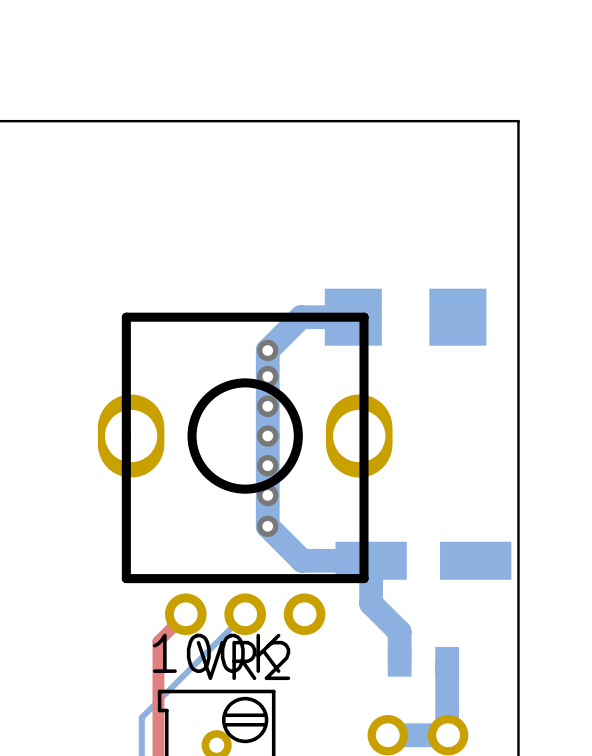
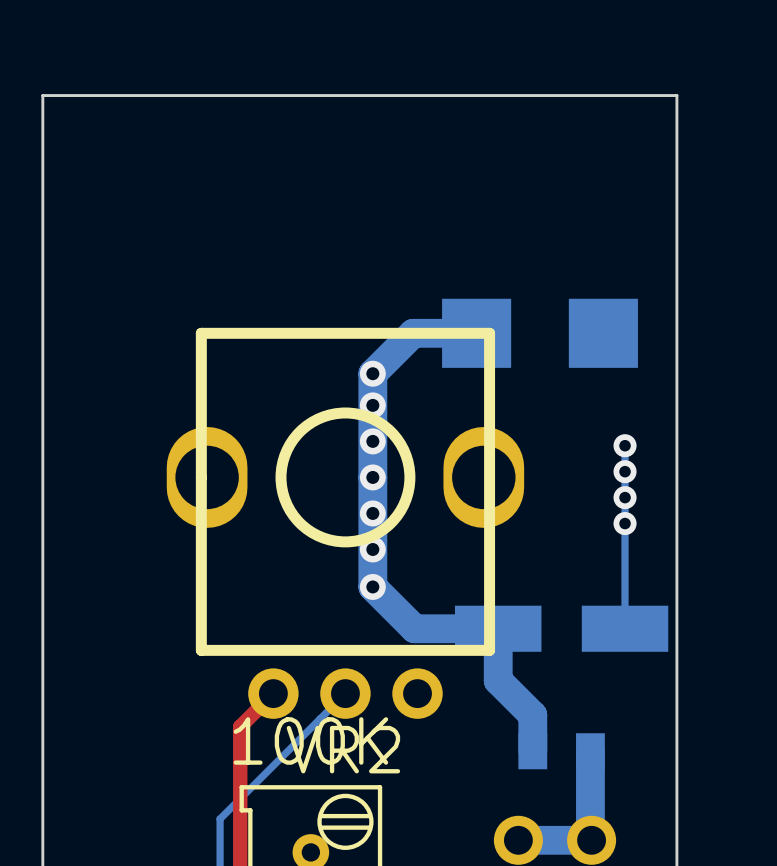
bottom track: none -> (625, 445) (625, 628)
via: none -> (625, 445)
via: none -> (625, 471)
via: none -> (625, 497)
via: none -> (625, 523)

